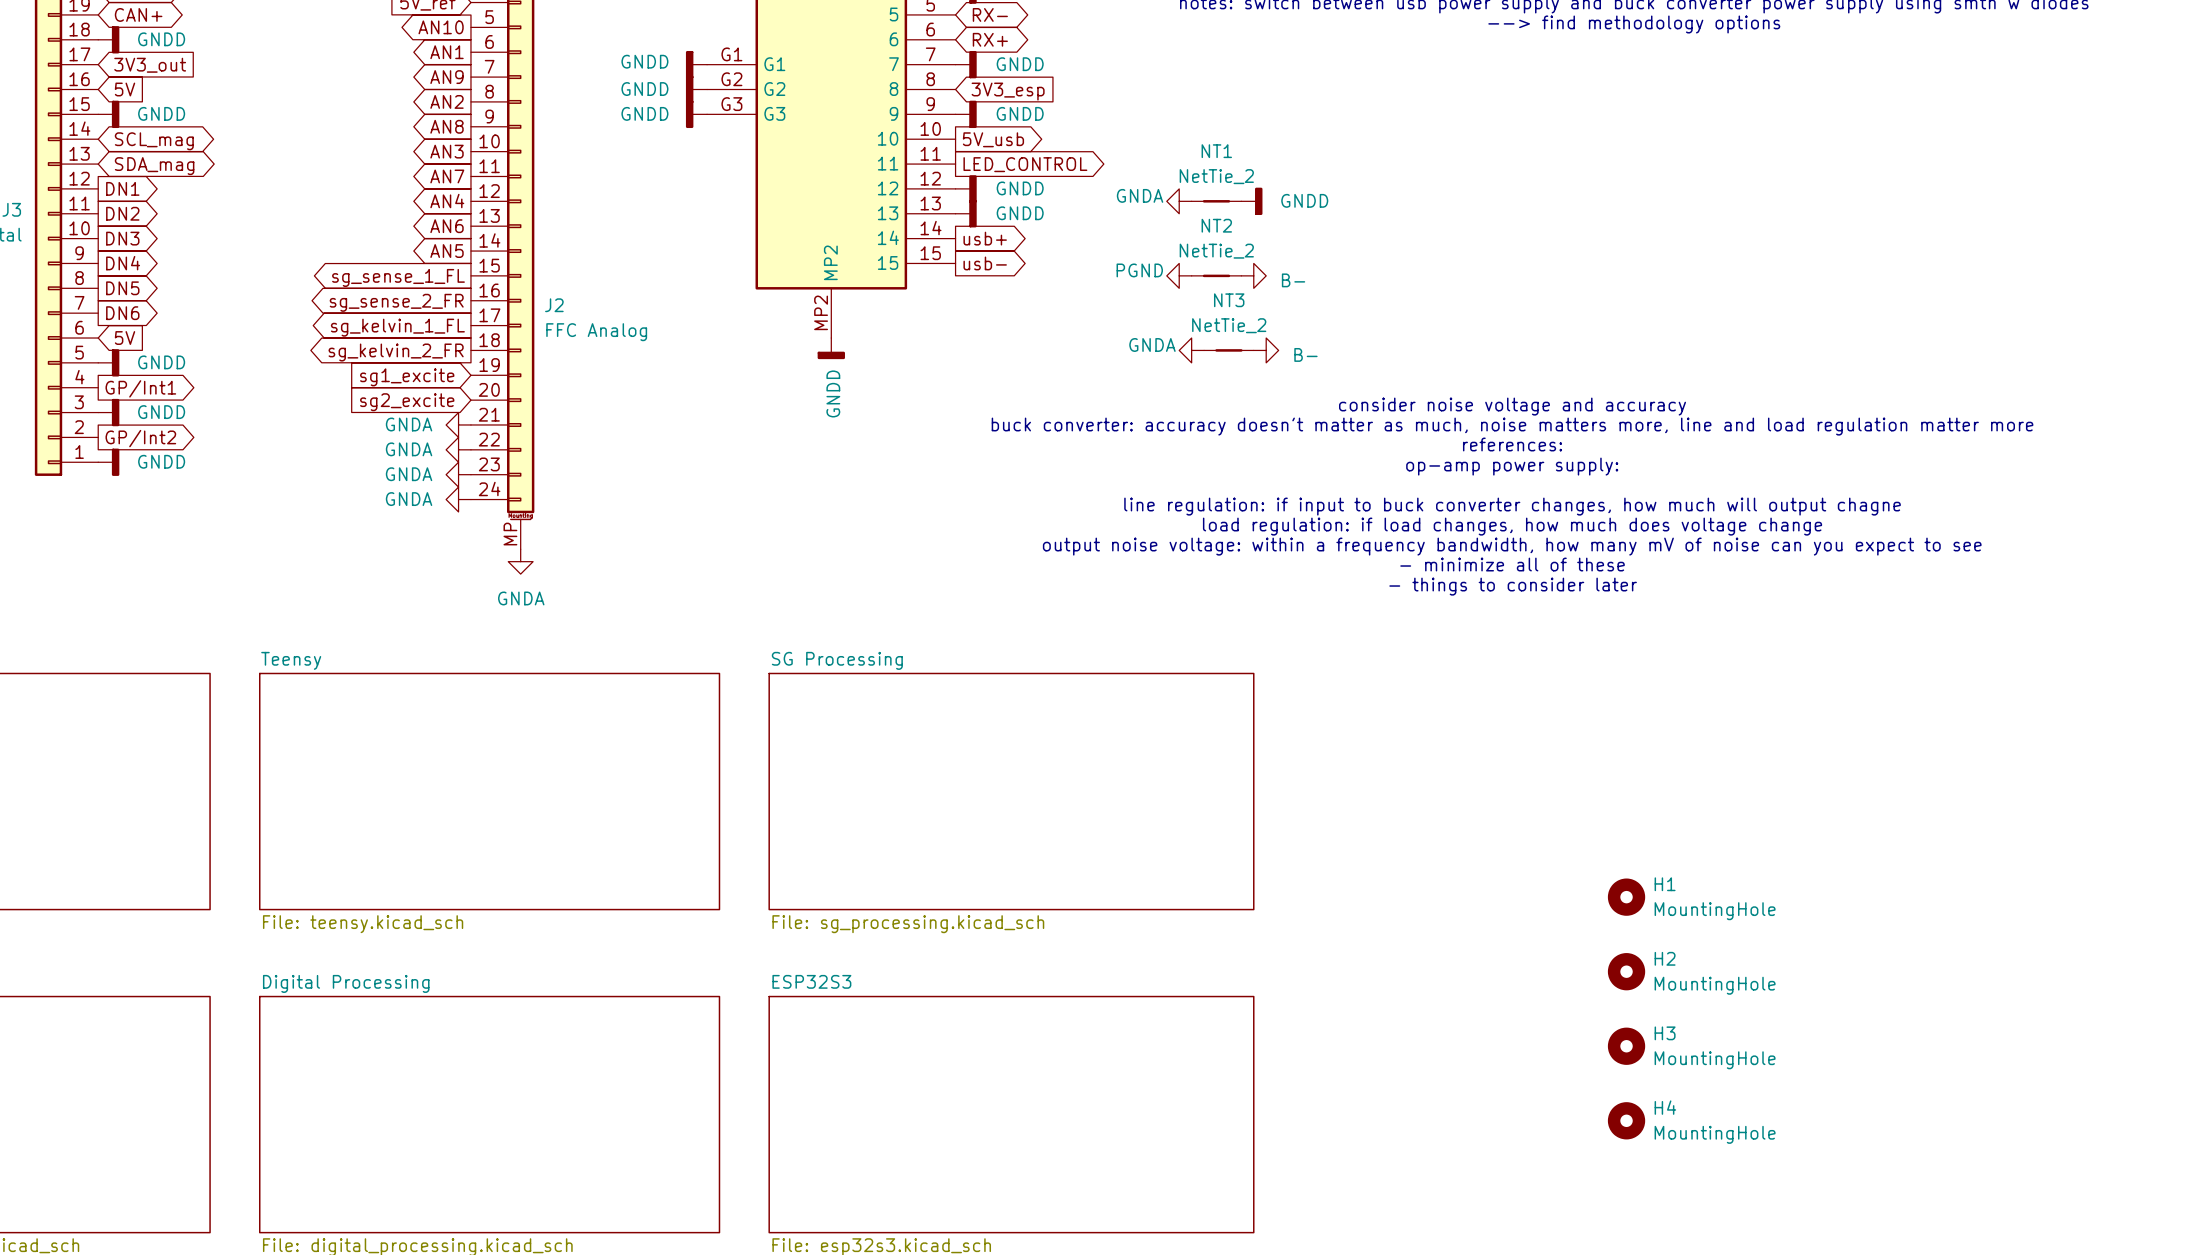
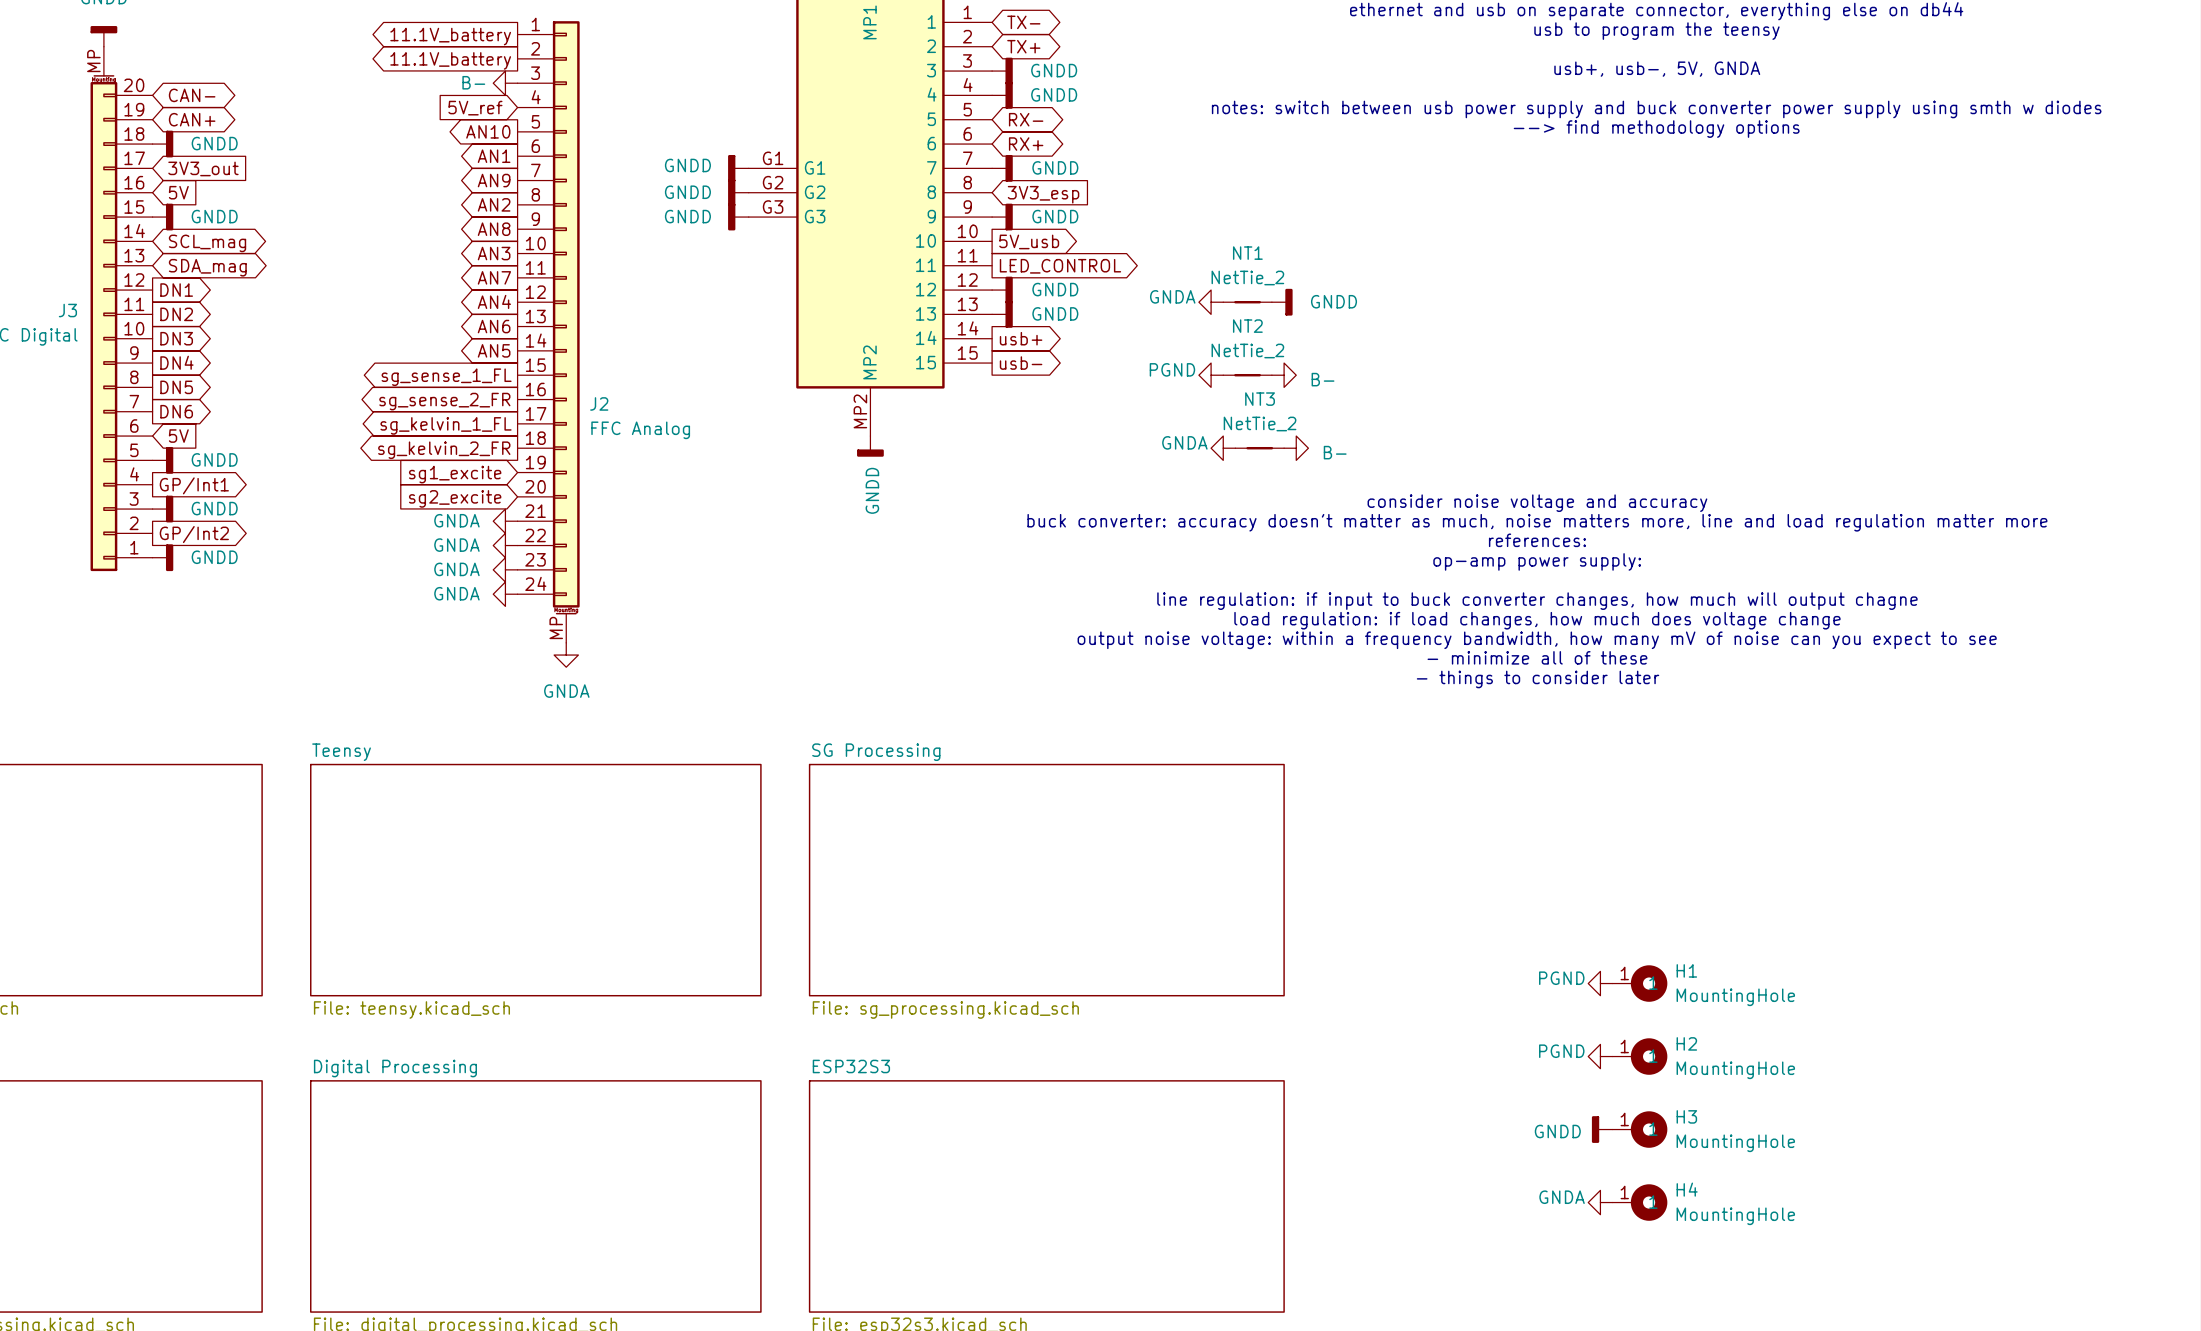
H1 symbol: [1607, 878, 1646, 916] -> [1612, 965, 1668, 1002]
power symbol: none -> PGND (1600, 983)
H2 symbol: [1607, 953, 1646, 991] -> [1612, 1038, 1668, 1075]
power symbol: none -> PGND (1600, 1056)
H3 symbol: [1607, 1027, 1646, 1065] -> [1612, 1111, 1668, 1148]
power symbol: none -> GNDD (1602, 1129)
H4 symbol: [1607, 1102, 1646, 1140] -> [1612, 1184, 1668, 1221]
power symbol: none -> GNDA (1600, 1202)

